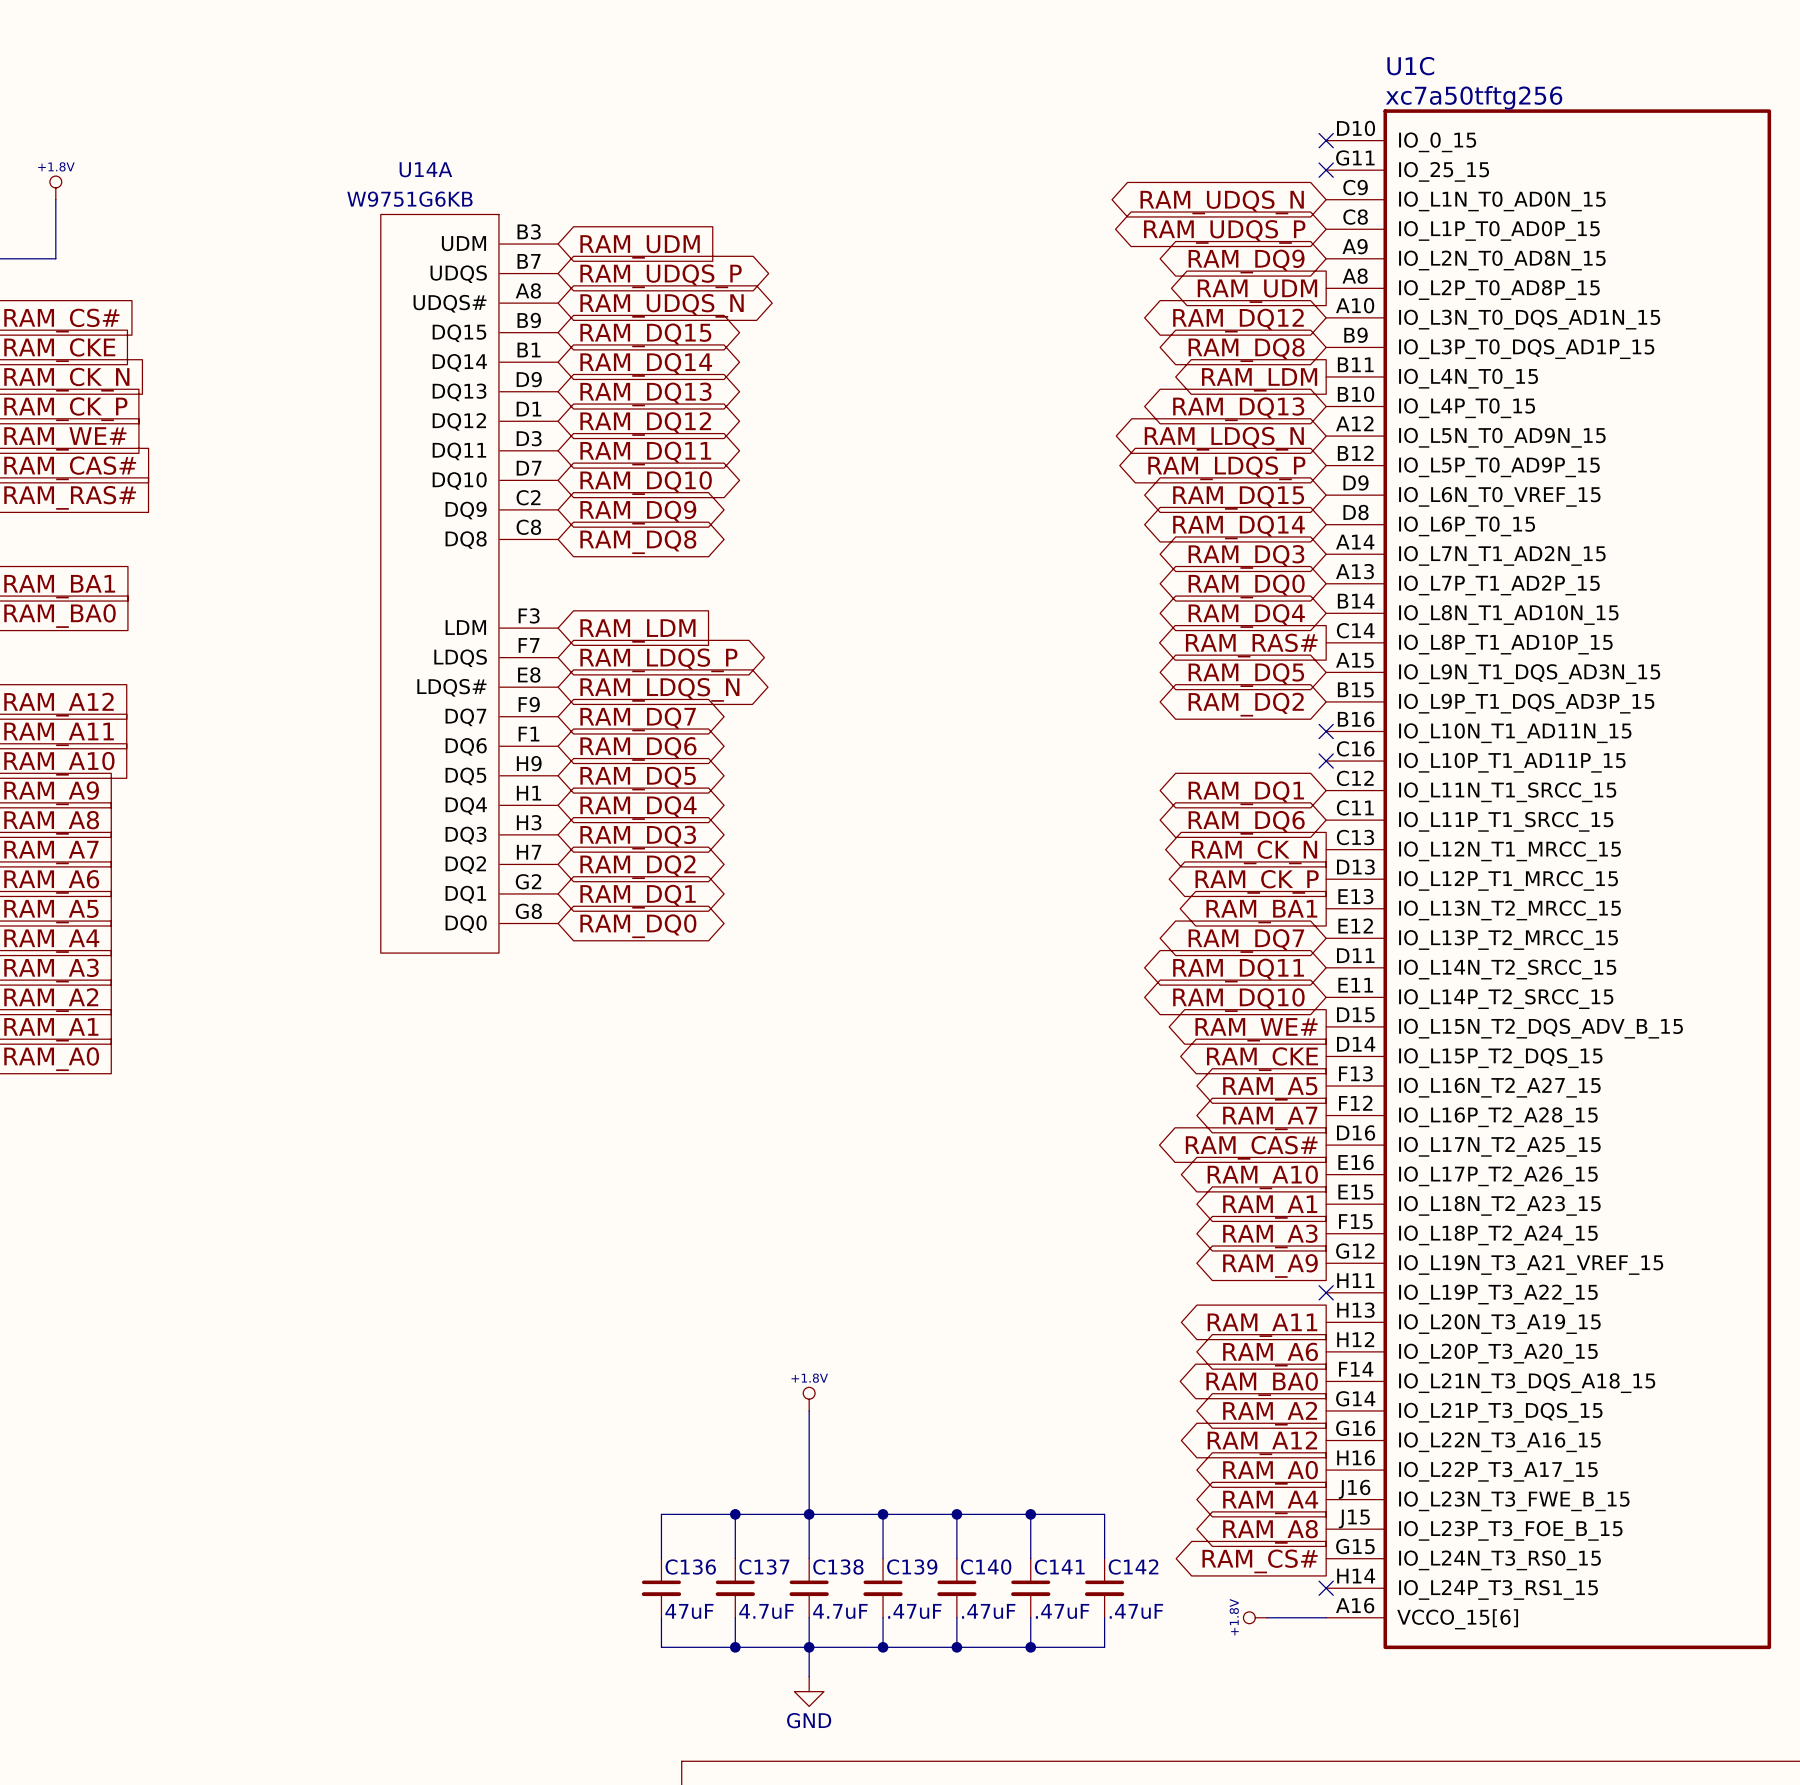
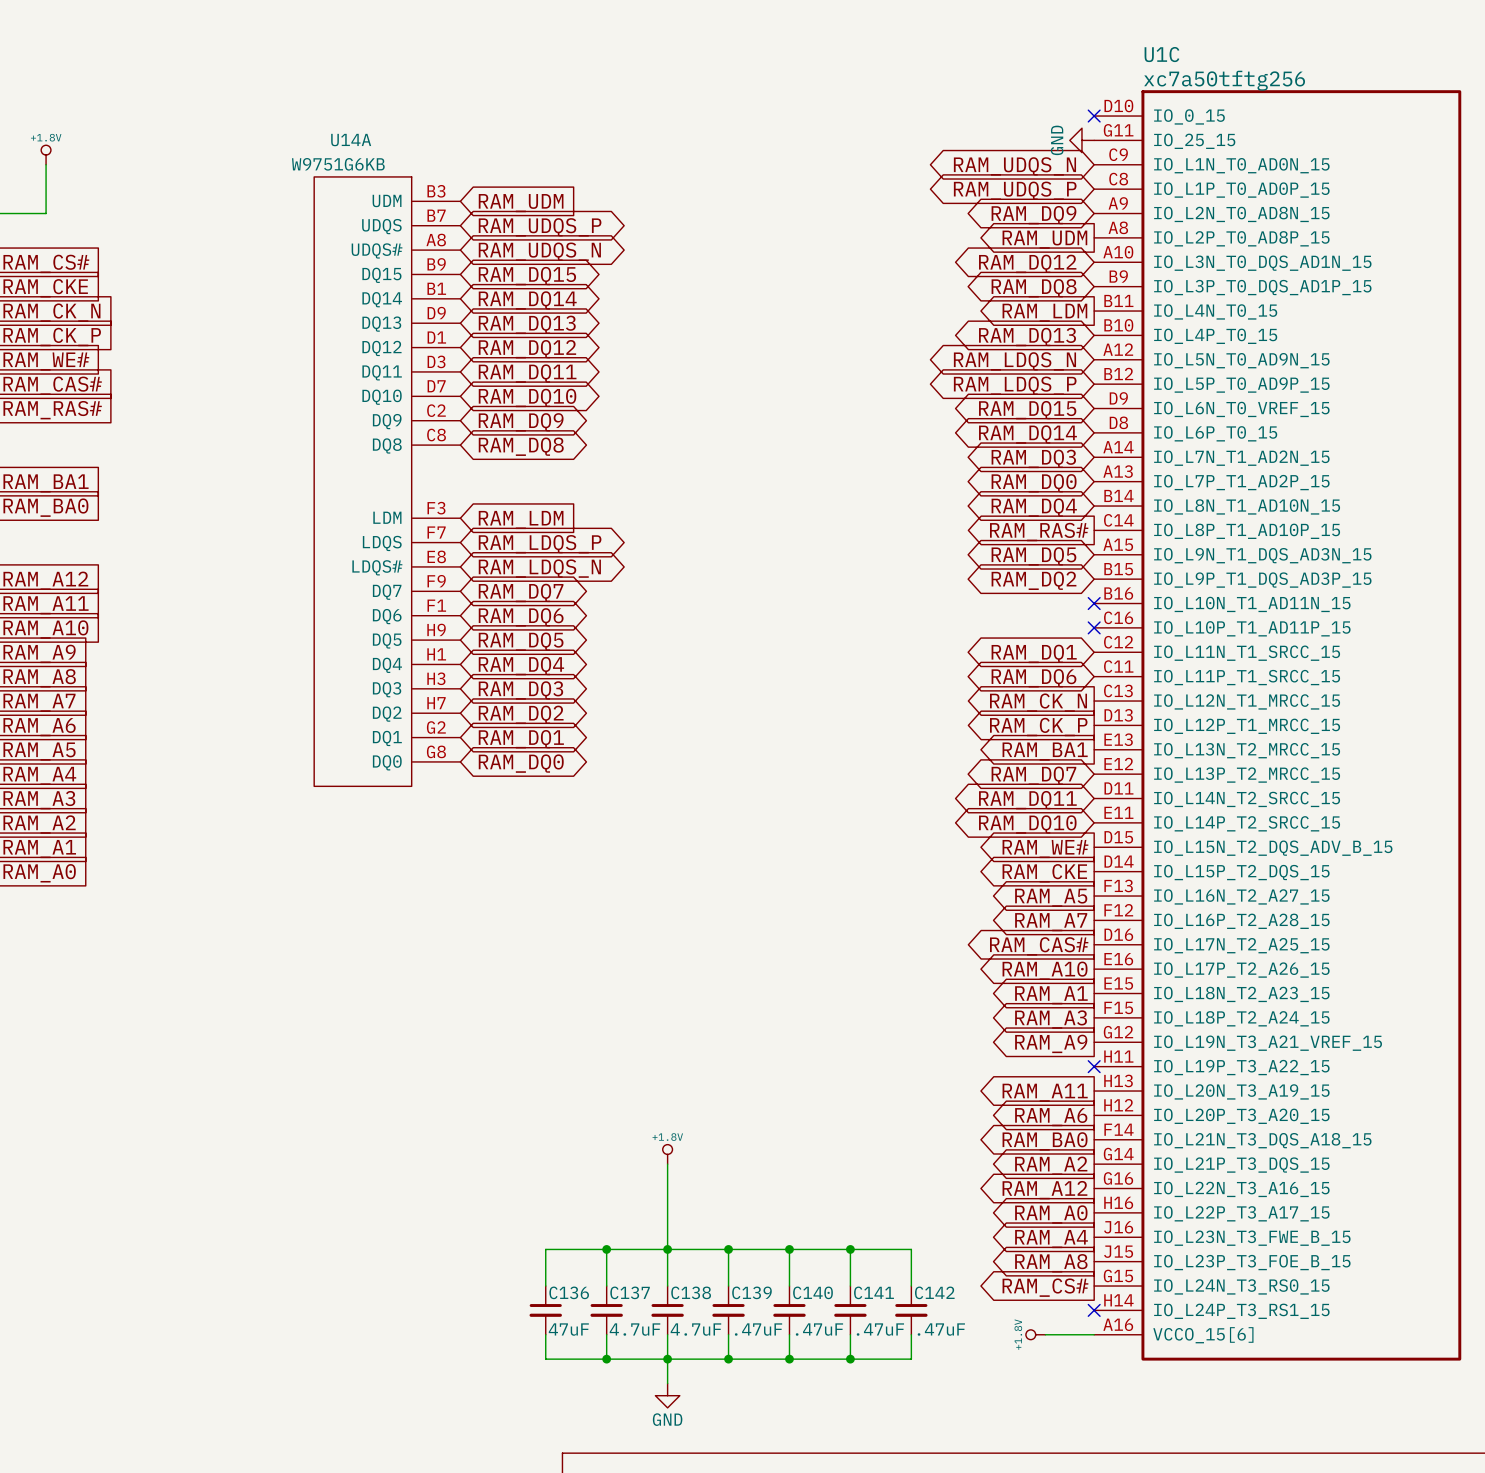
power symbol: none -> GND (1081, 140)
no-connect mark: (1326, 170) -> none

